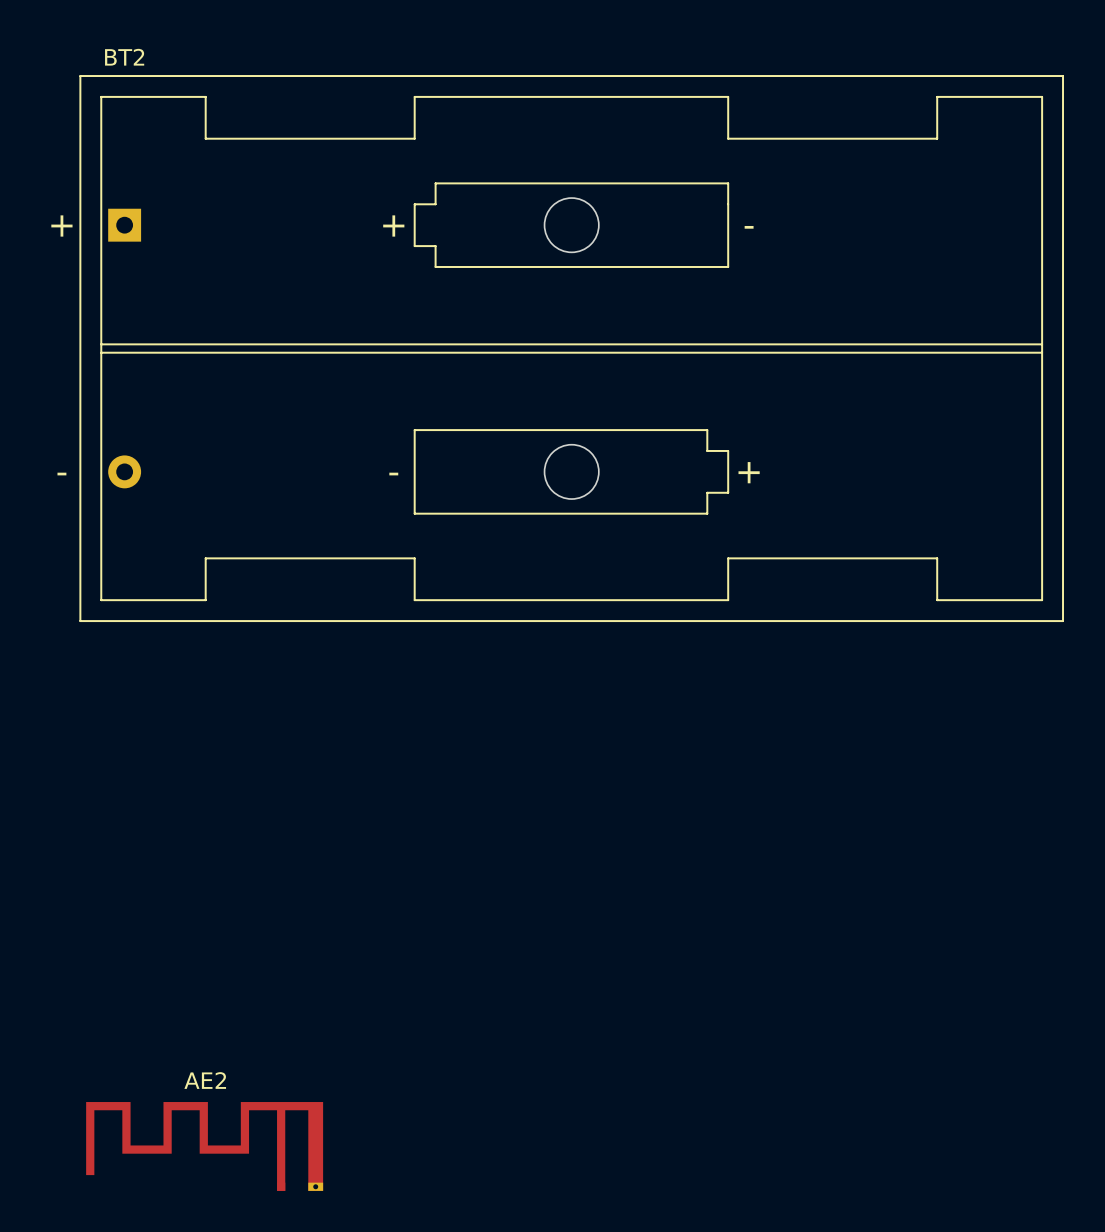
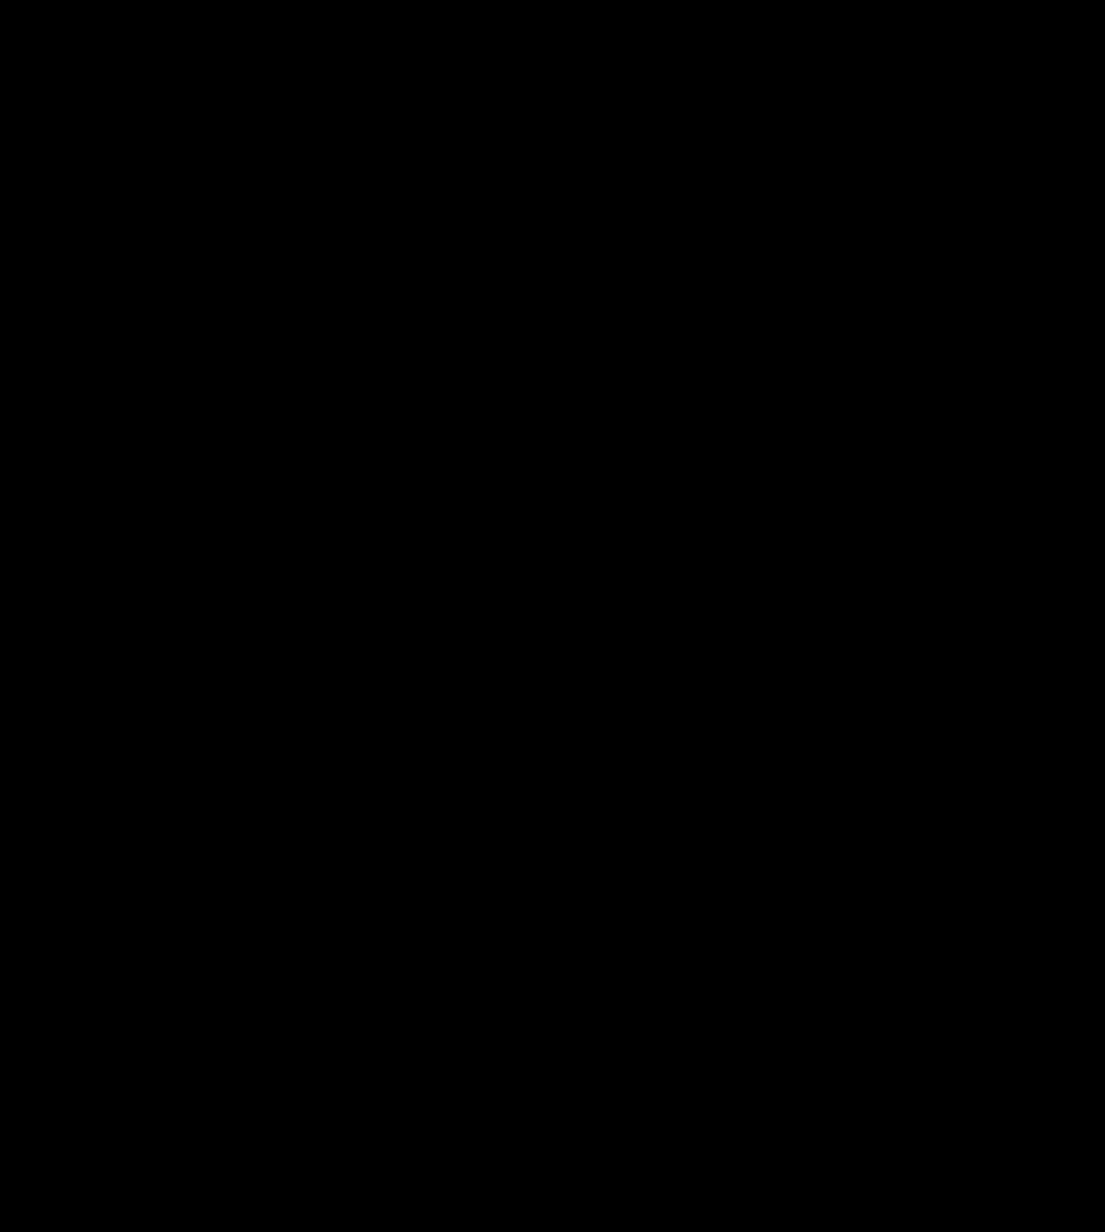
BT2: (571, 348) -> none
AE2: (204, 1146) -> none

